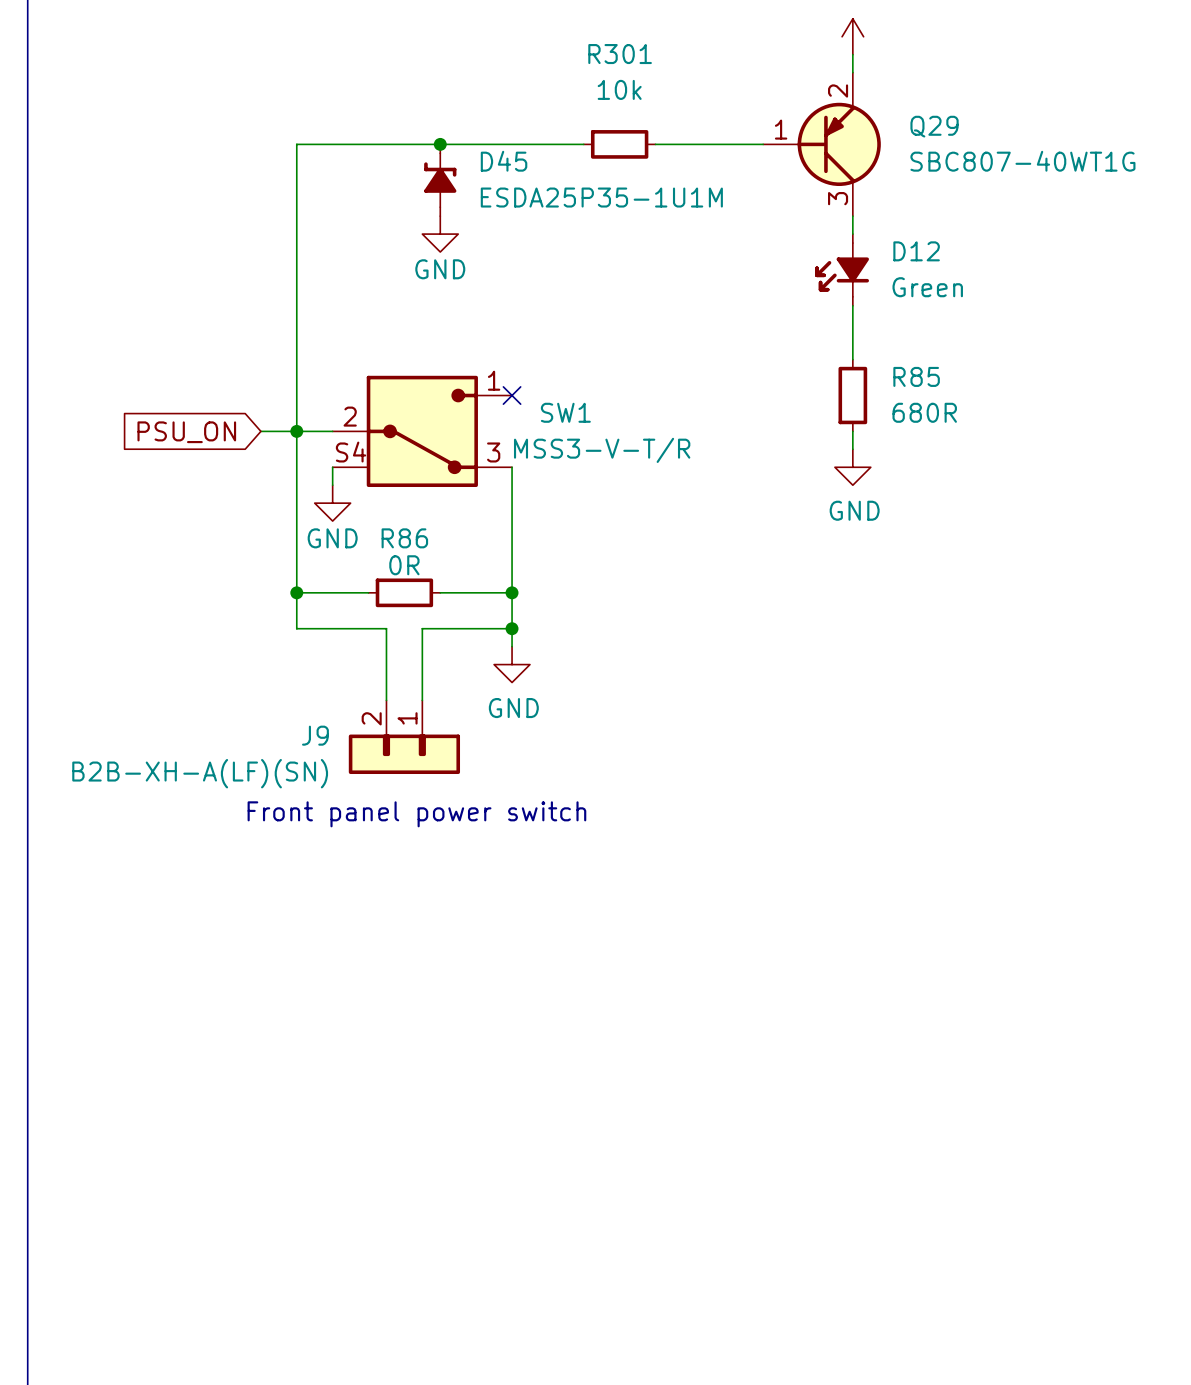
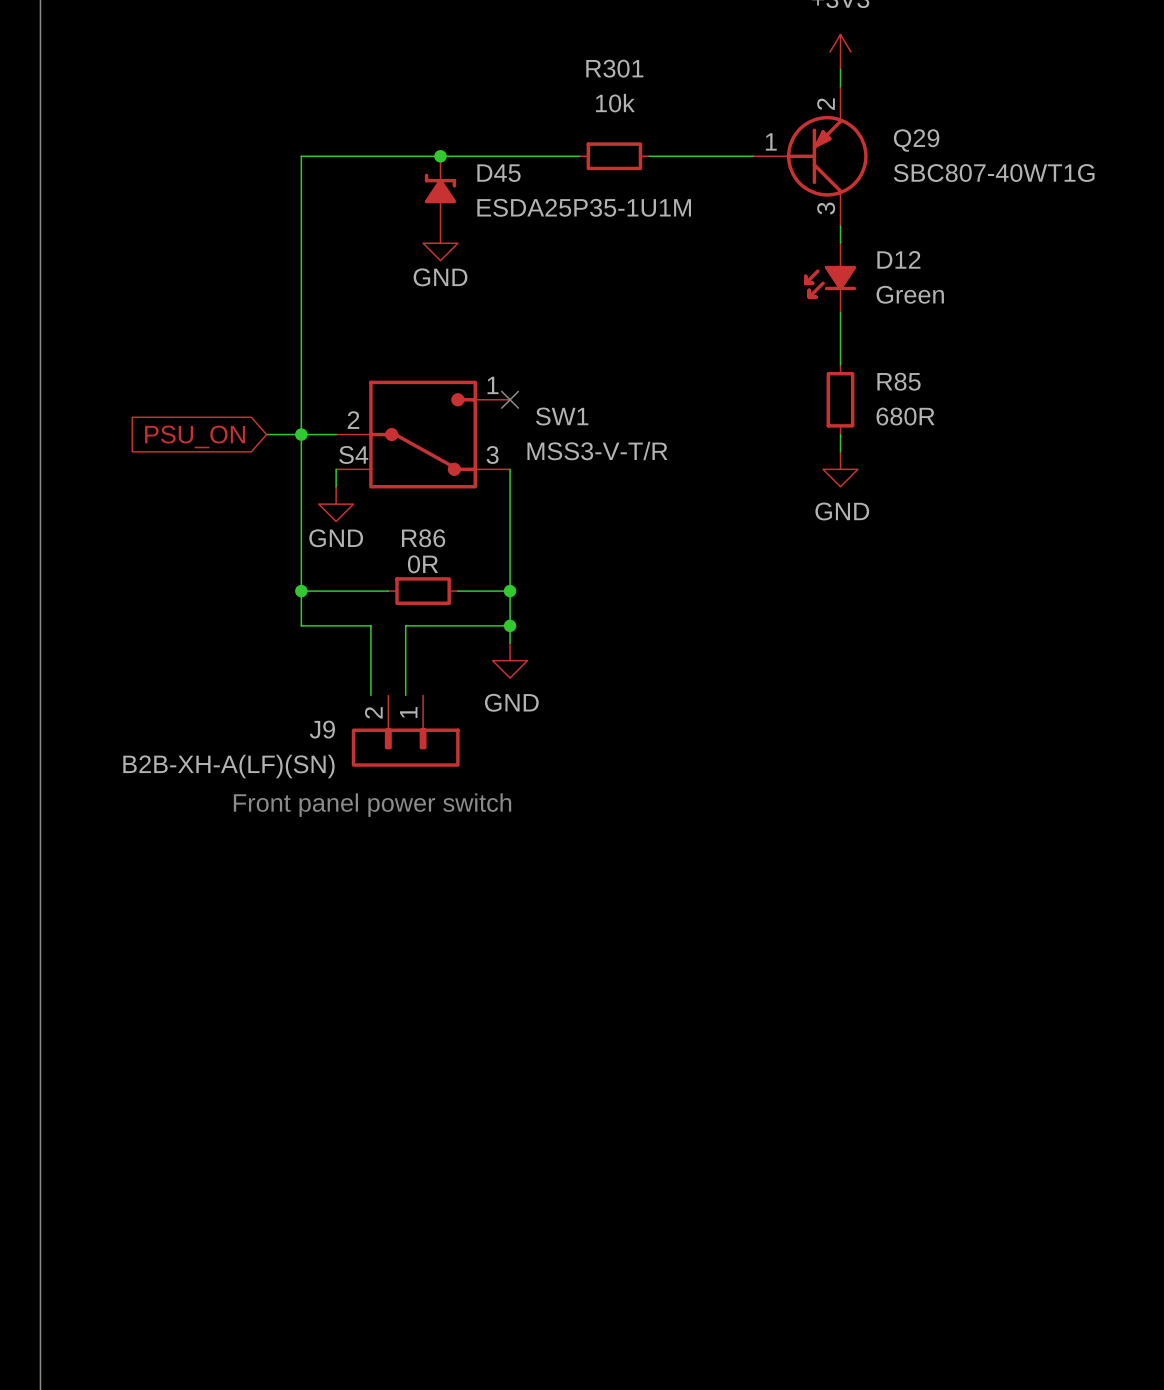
R86 position: (404, 592) -> (423, 591)
wire: (368, 628) (386, 628) (386, 700) -> (370, 625) (370, 695)
wire: (422, 628) (422, 700) -> (423, 625) (405, 625) (405, 695)
text position: Front panel power switch (416, 814) -> Front panel power switch (372, 805)

